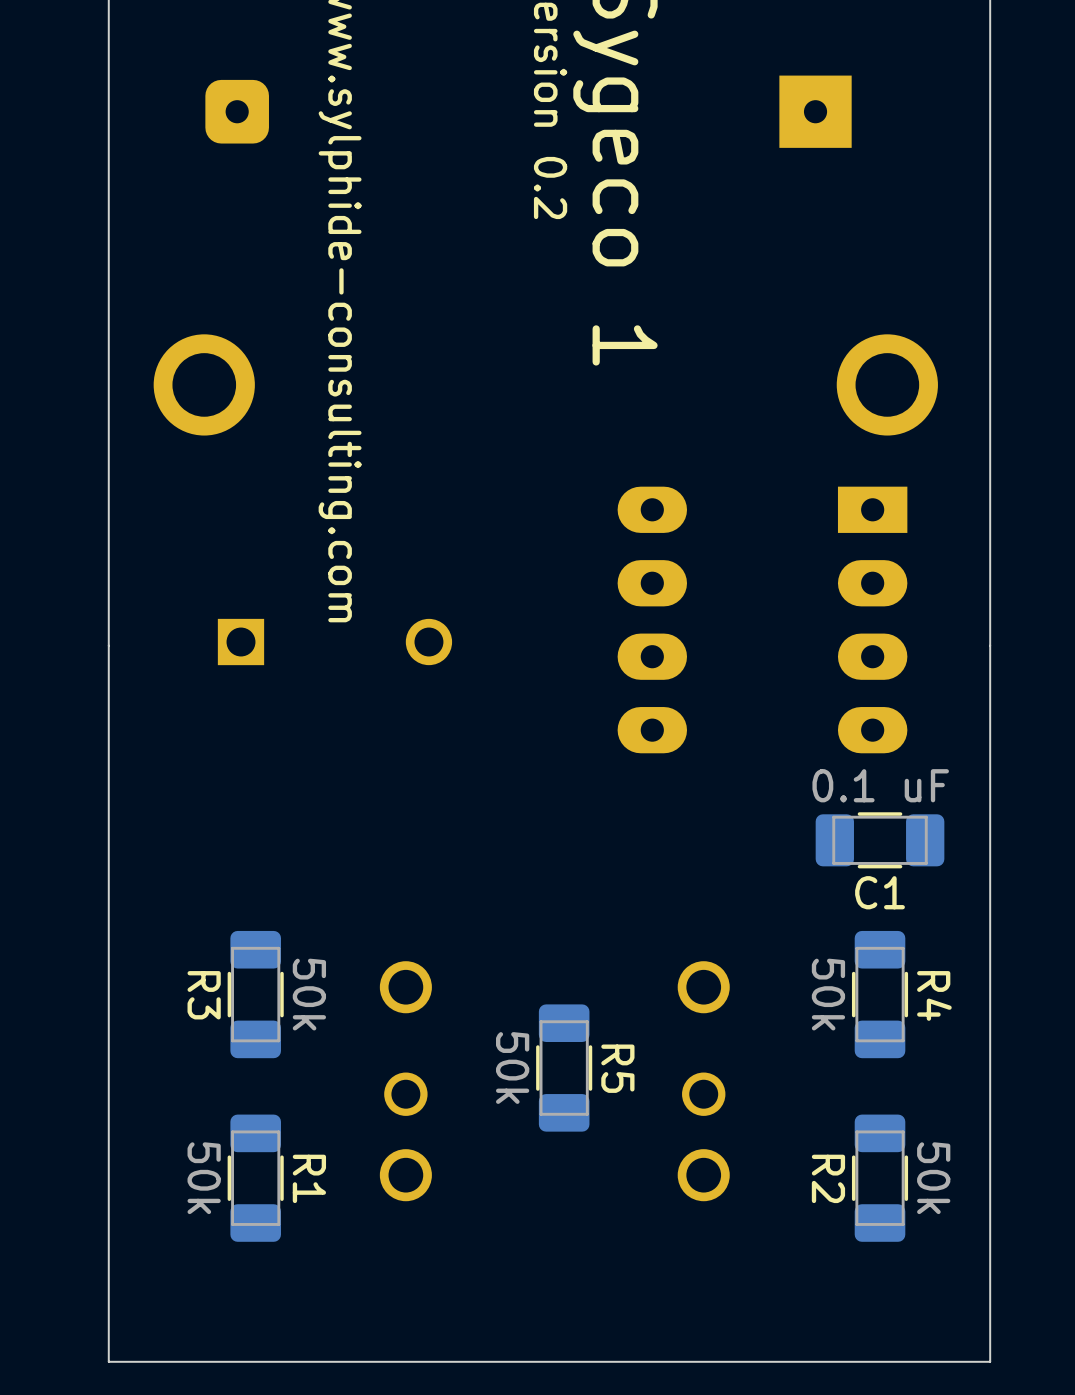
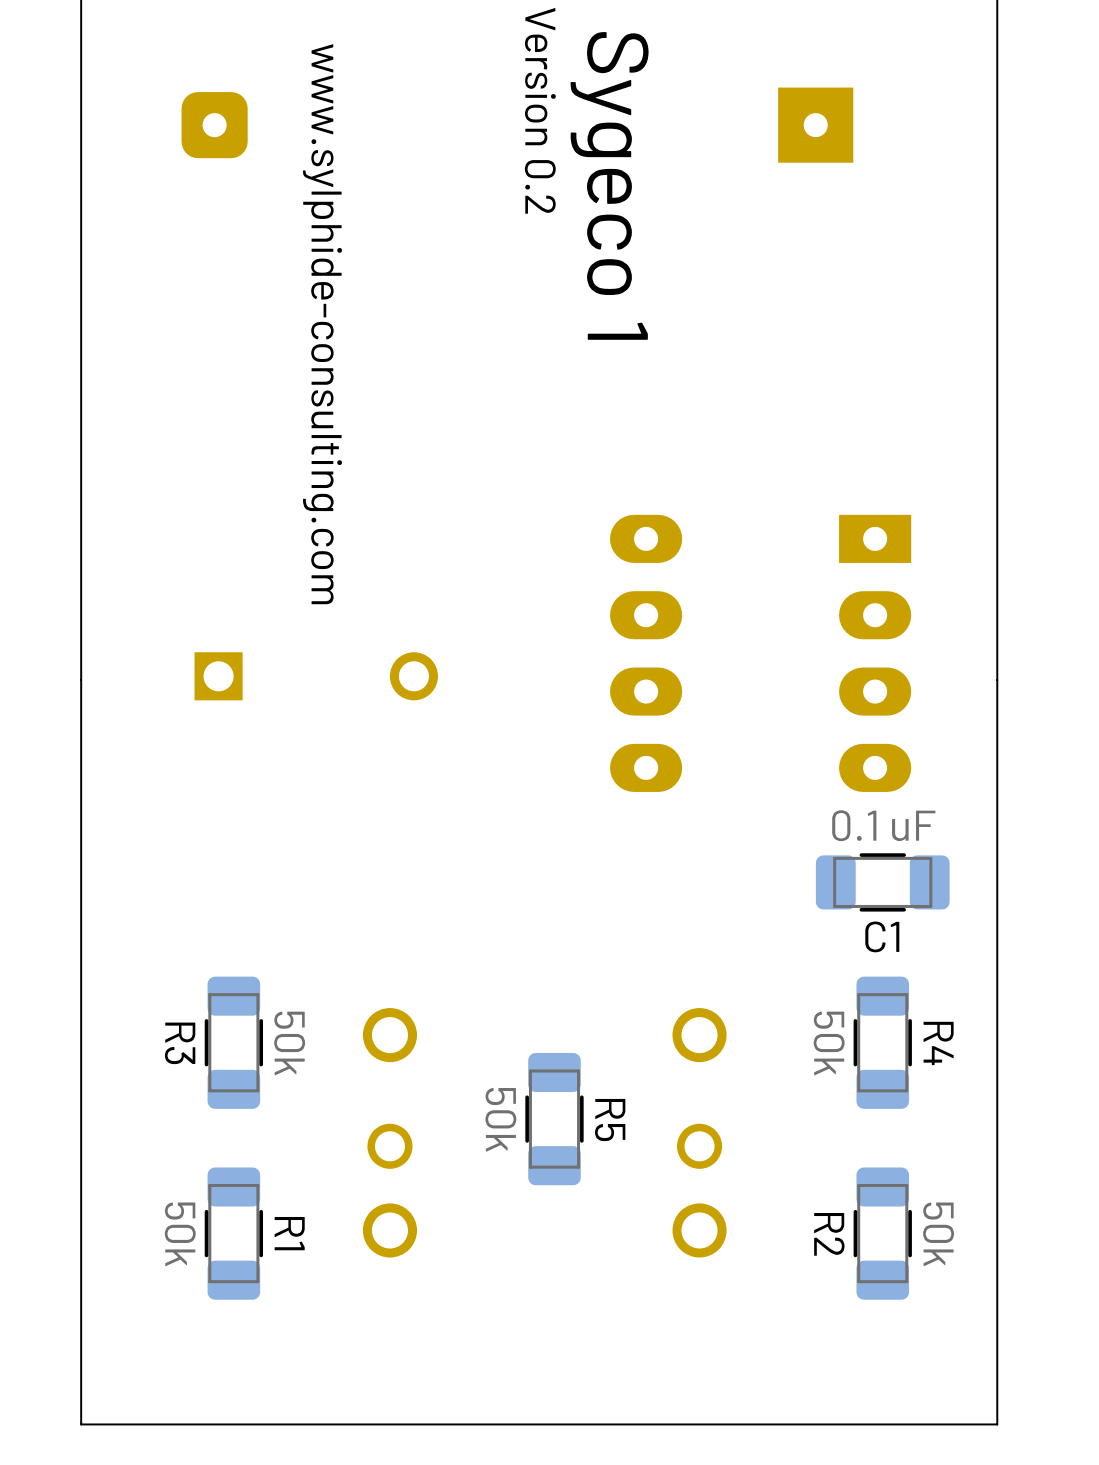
part: (204, 384) -> none
part: (887, 384) -> none

